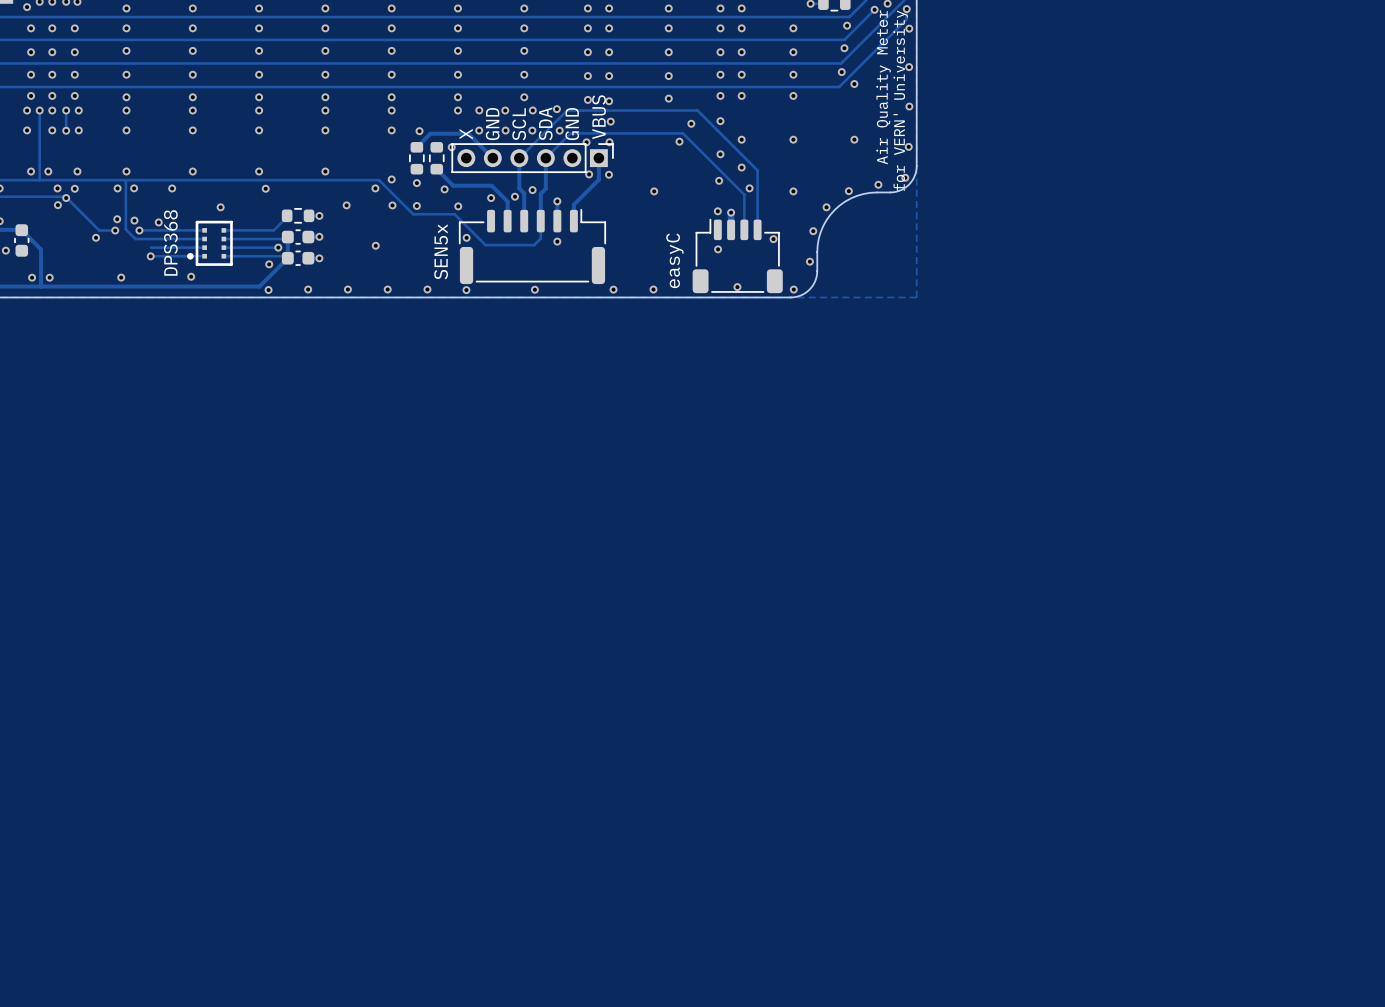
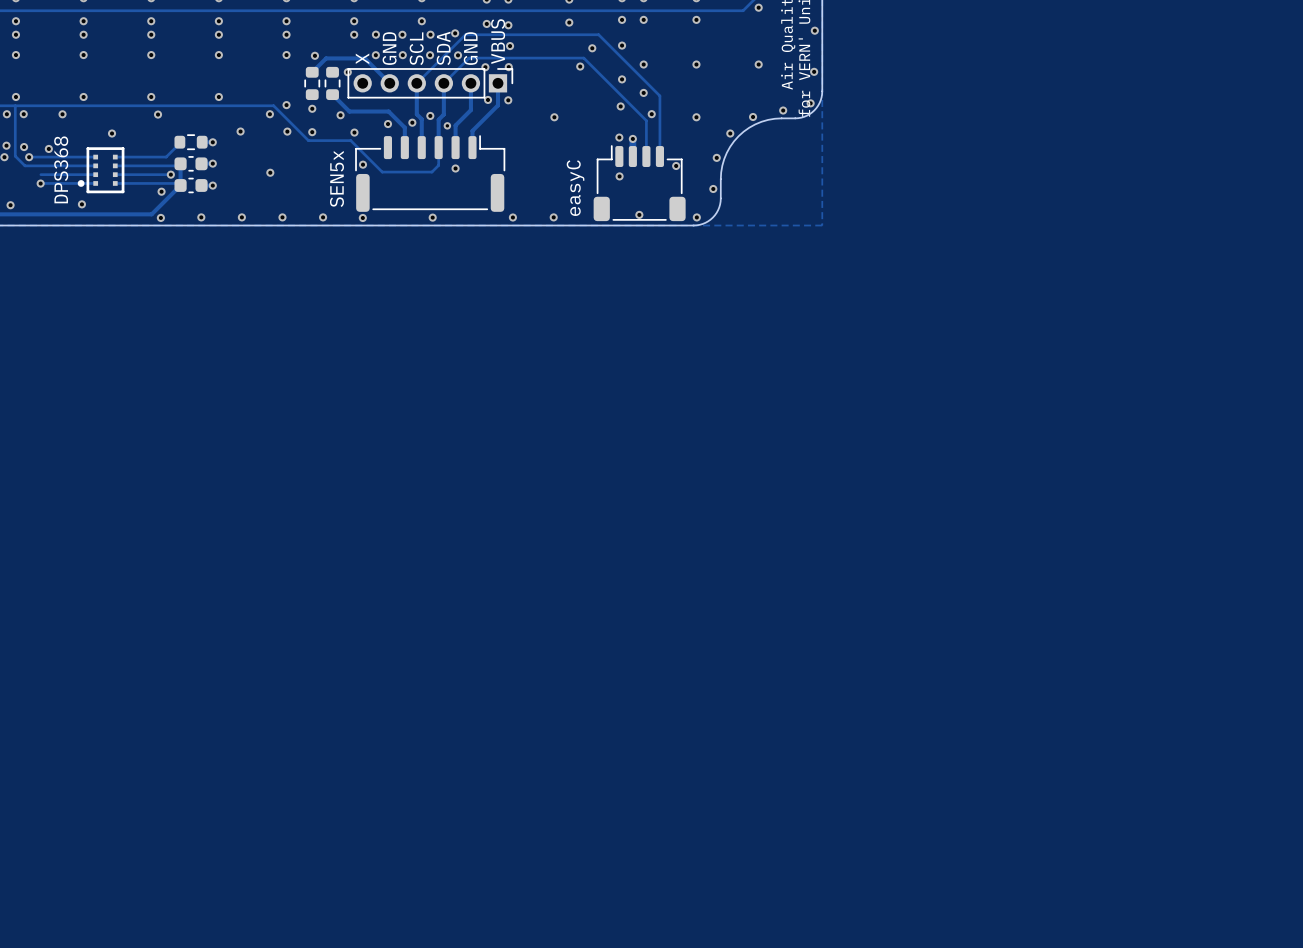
track: none -> (470, 83) (470, 110) (455, 127)
via: none -> (447, 125)
via: (557, 201) -> none

